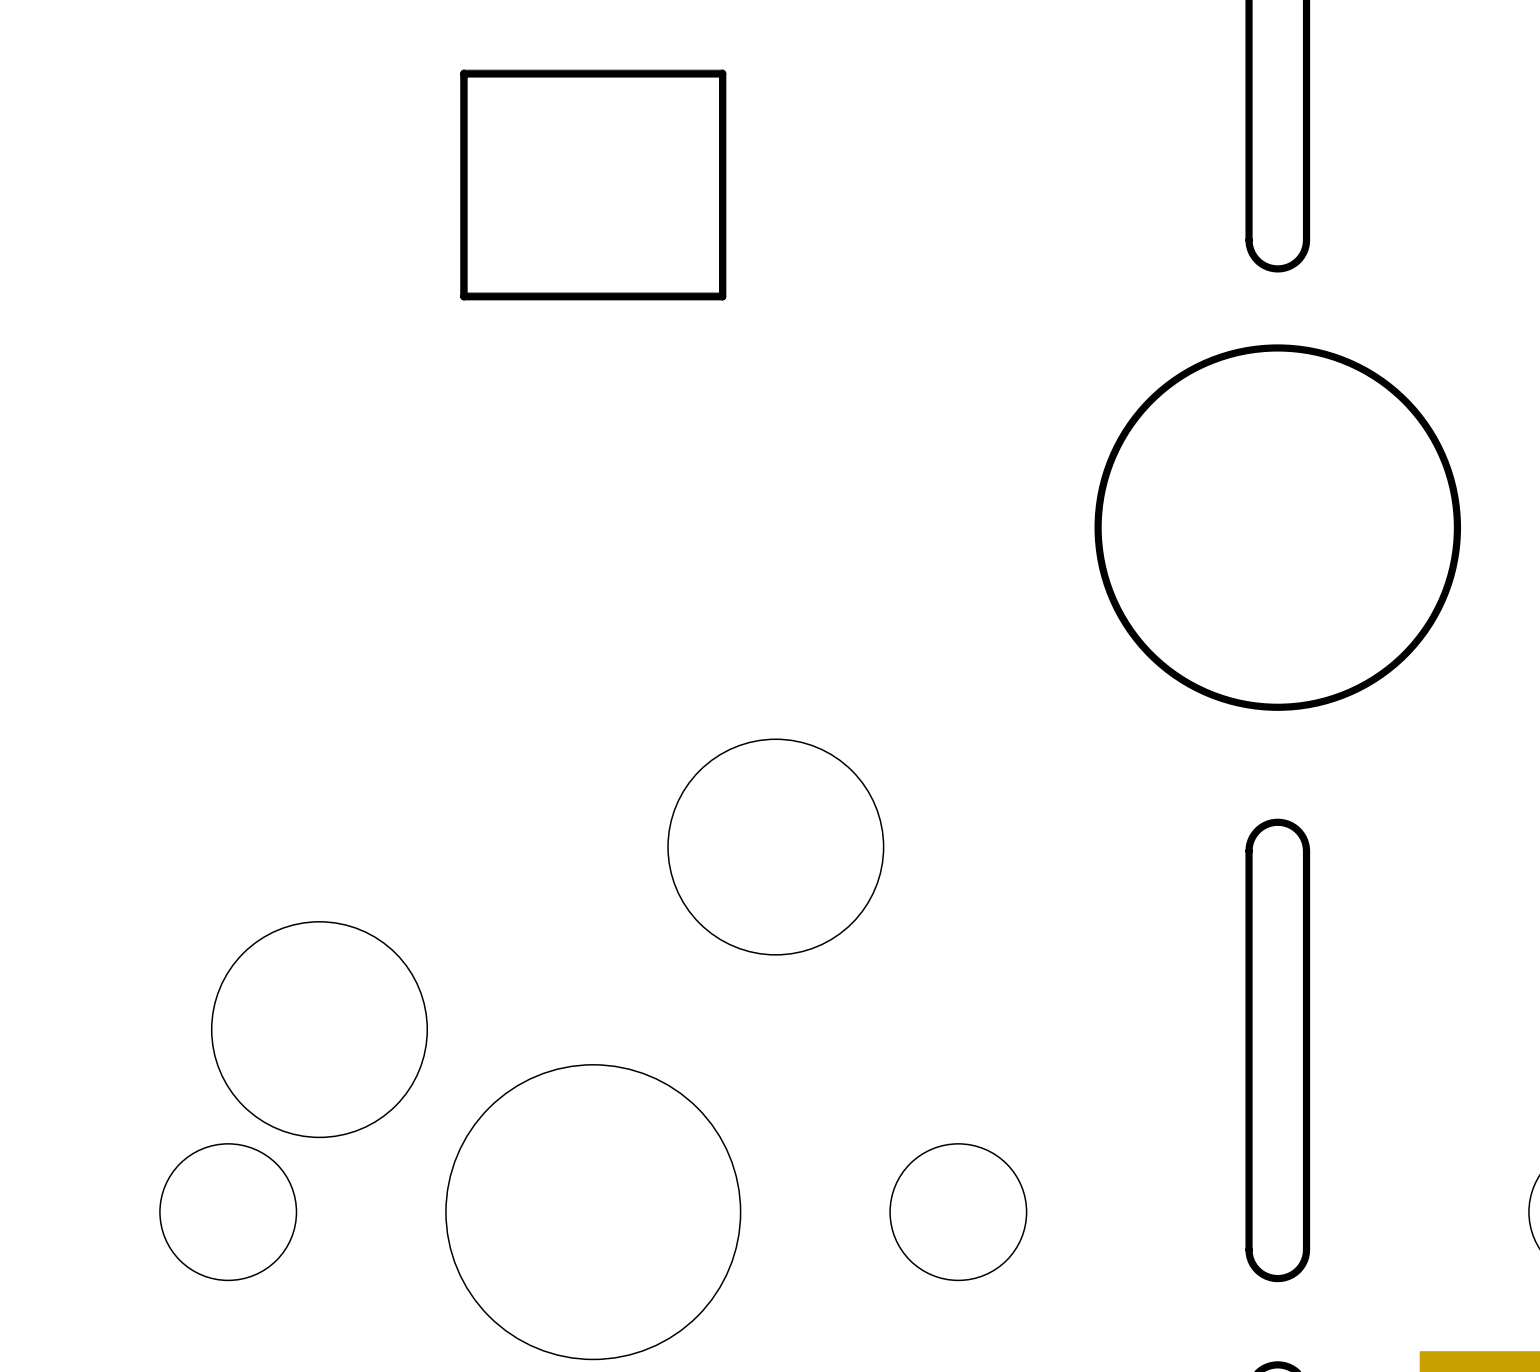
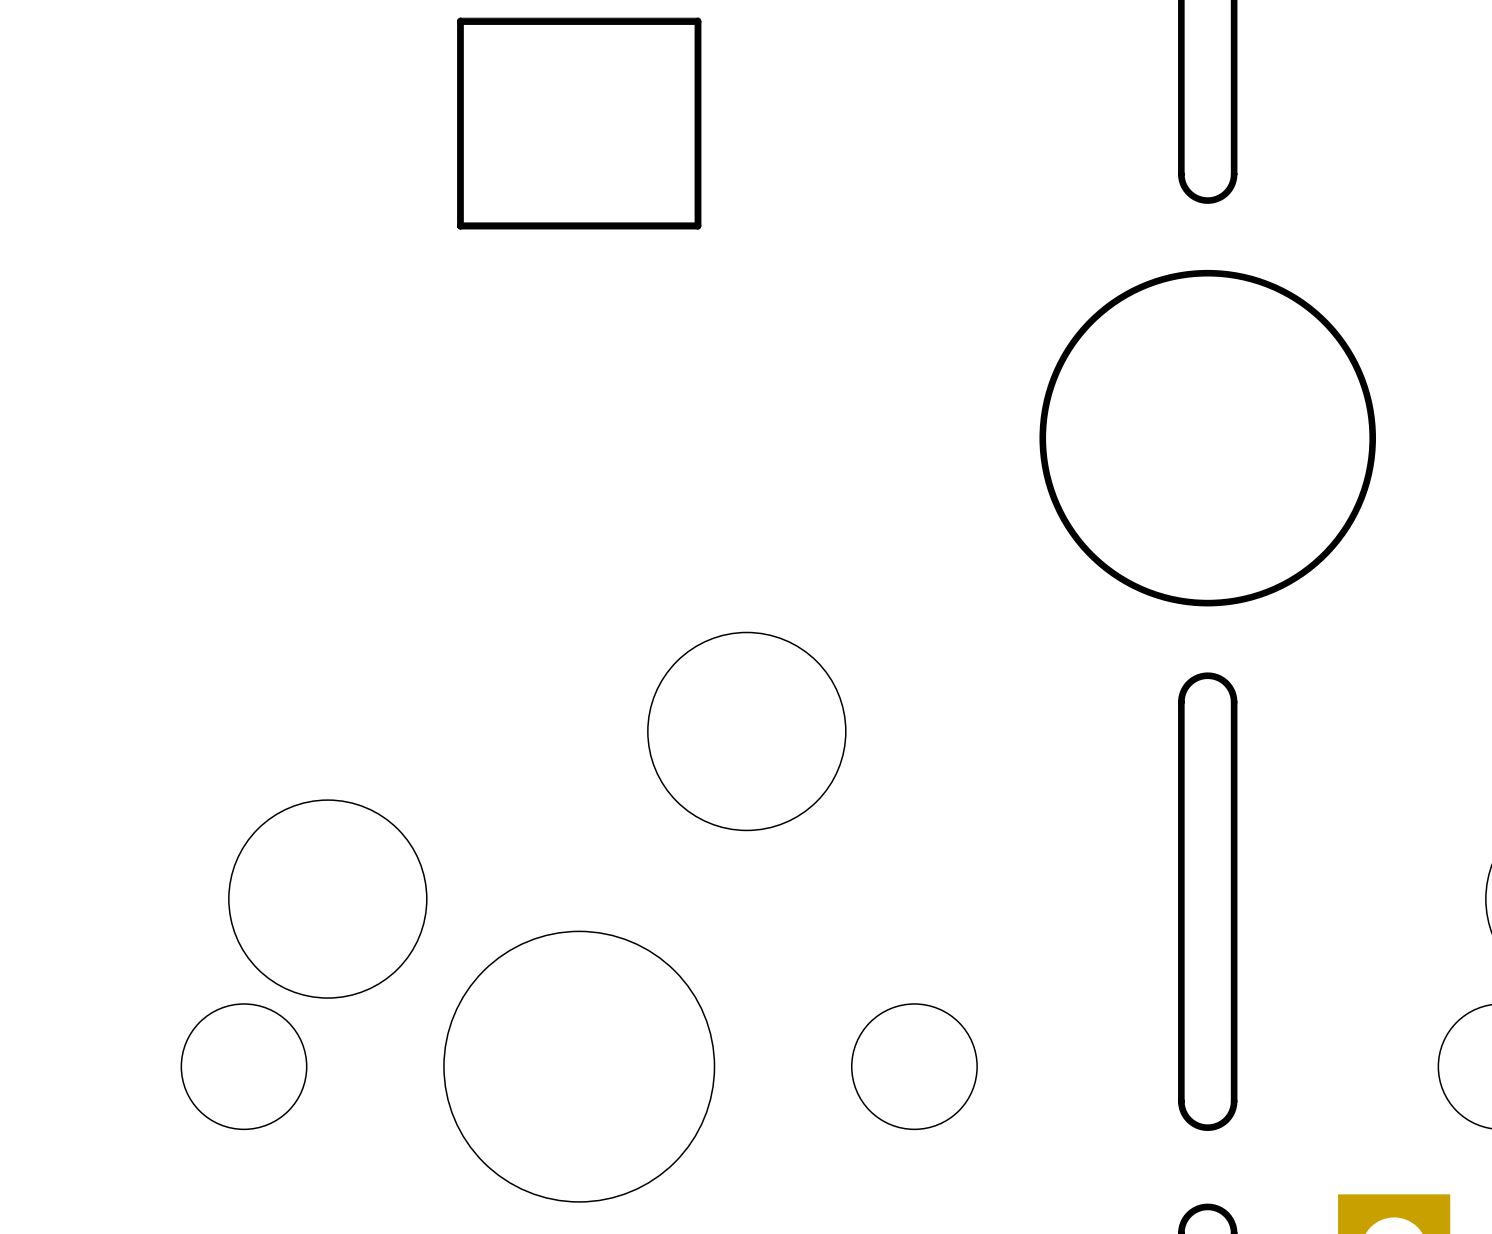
board edge: (1249, 851) (1250, 840) (1256, 831) (1264, 825) (1277, 822) (1291, 825) (1299, 831) (1304, 840) (1306, 851) -> (1181, 735) (1183, 692) (1192, 680) (1207, 675) (1222, 680) (1232, 692) (1234, 735)

